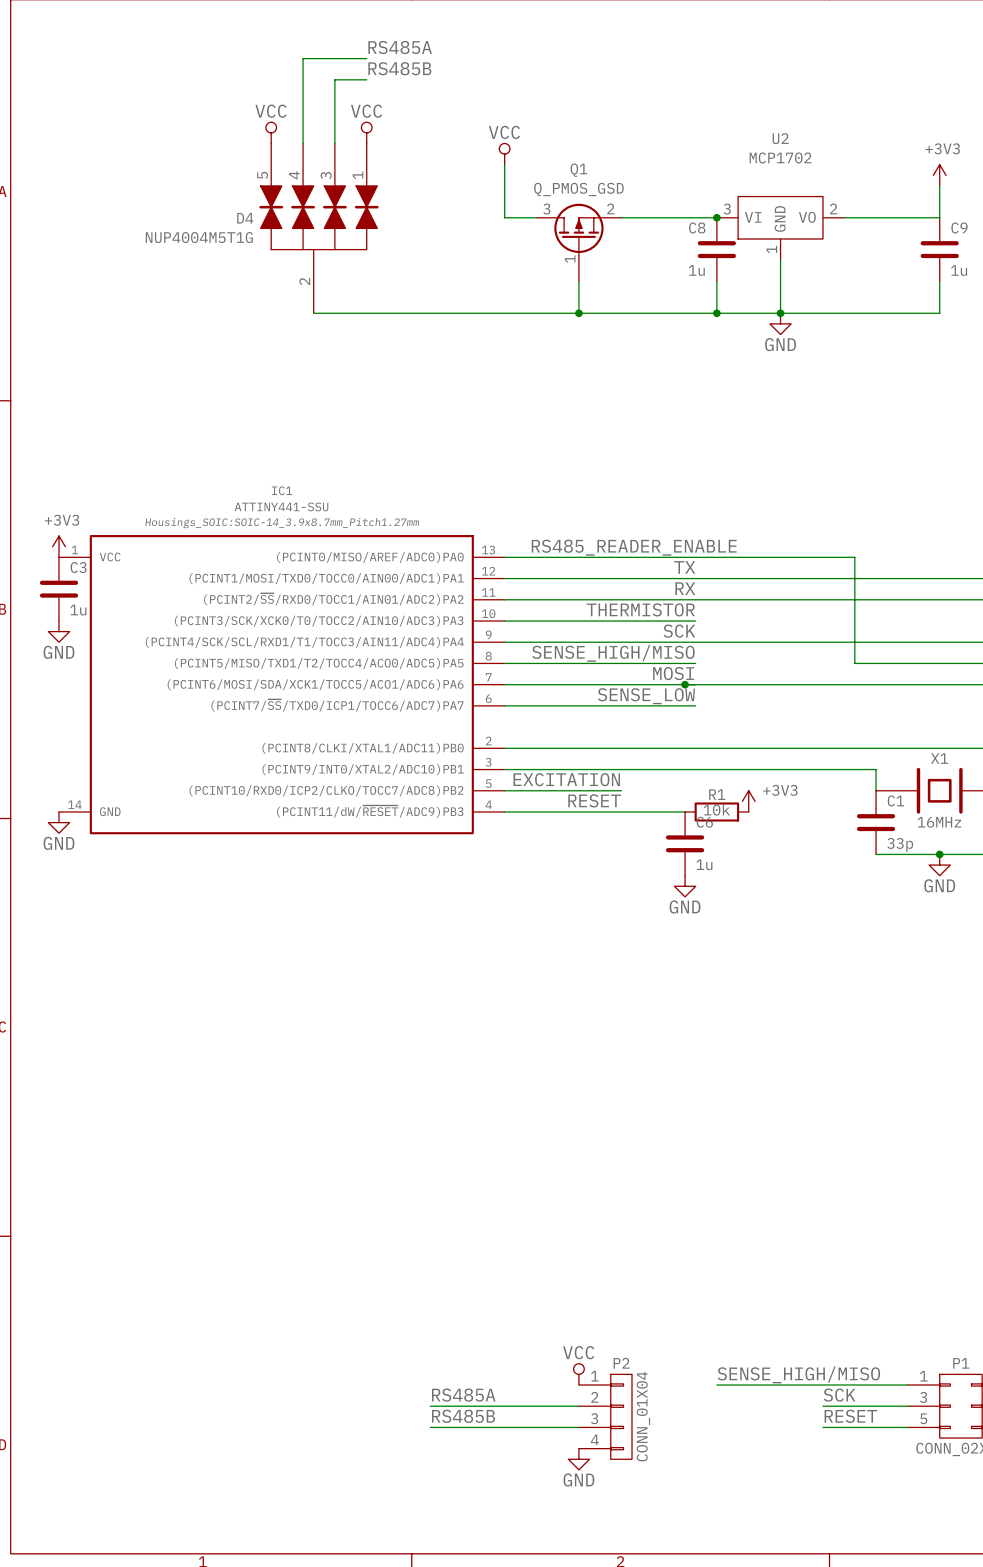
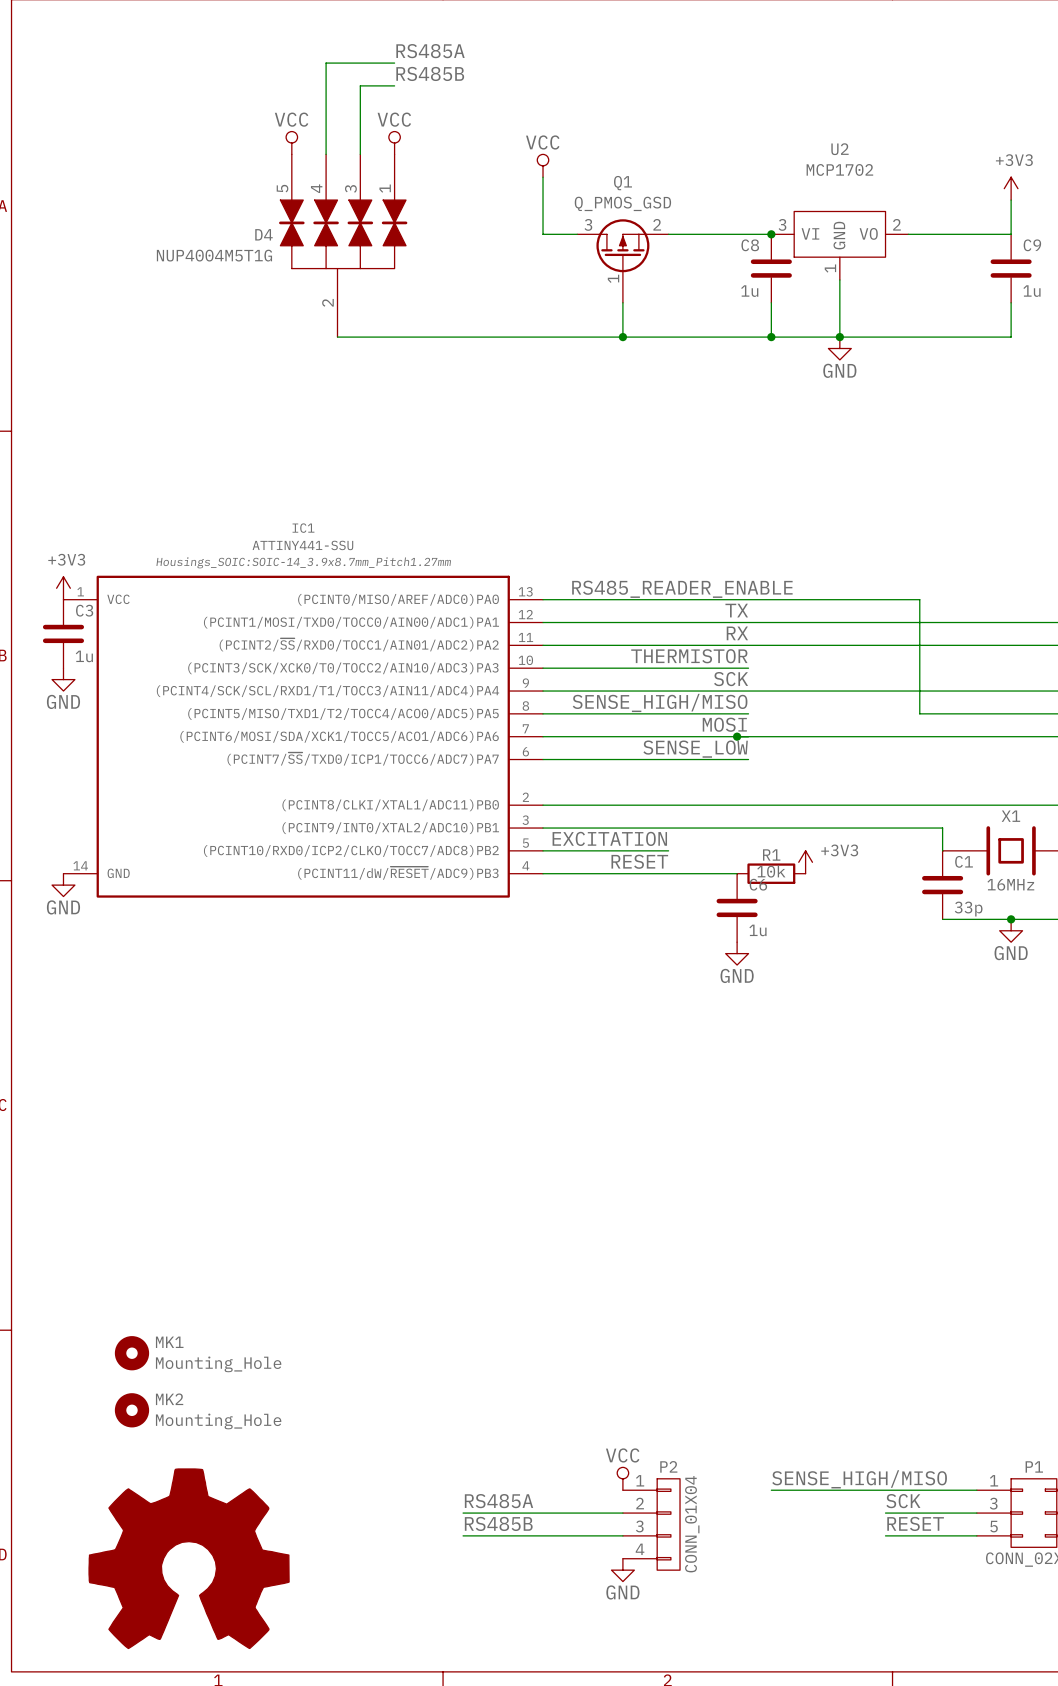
MK1: none -> Mounting_Hole (131, 1353)
MK2: none -> Mounting_Hole (131, 1410)
power symbol: none -> (189, 1558)

